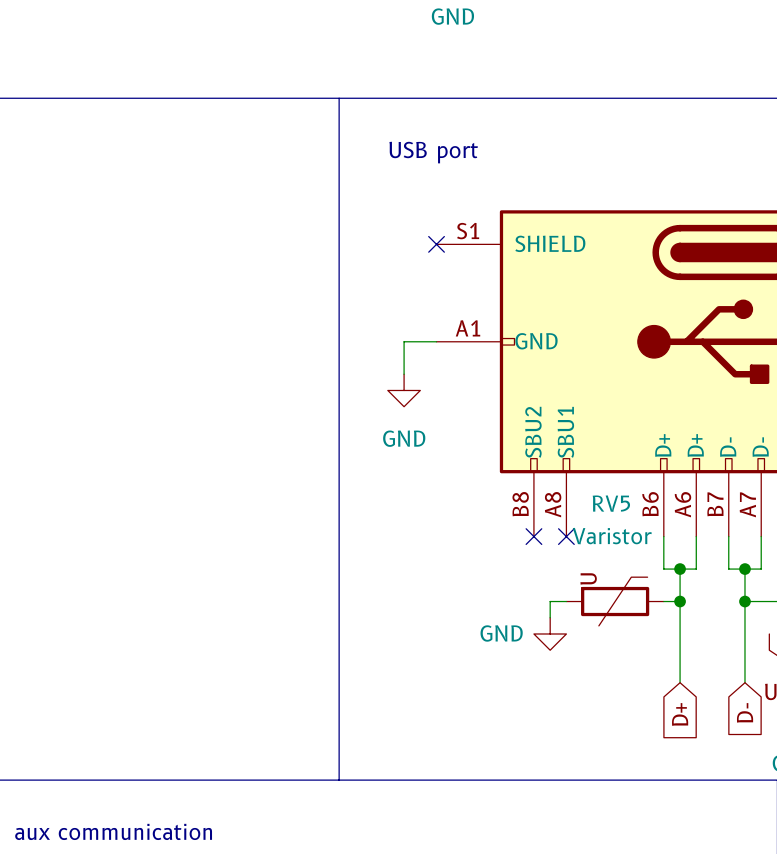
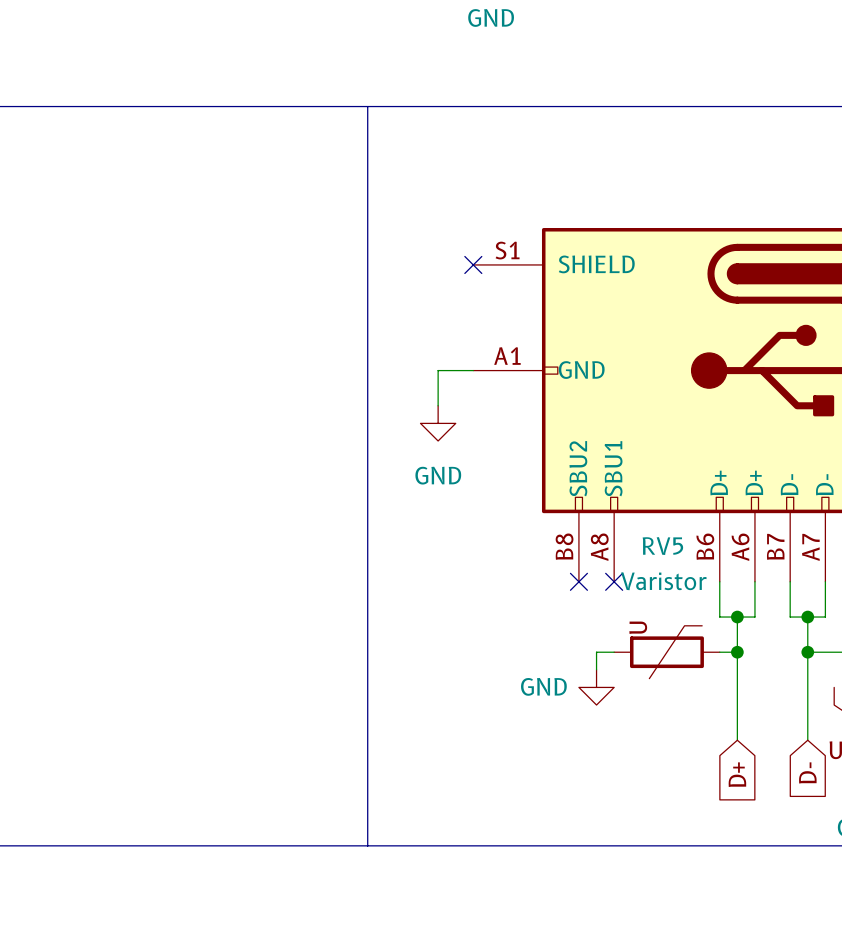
text: USB port (433, 152) -> none
text: aux communication (113, 831) -> none

